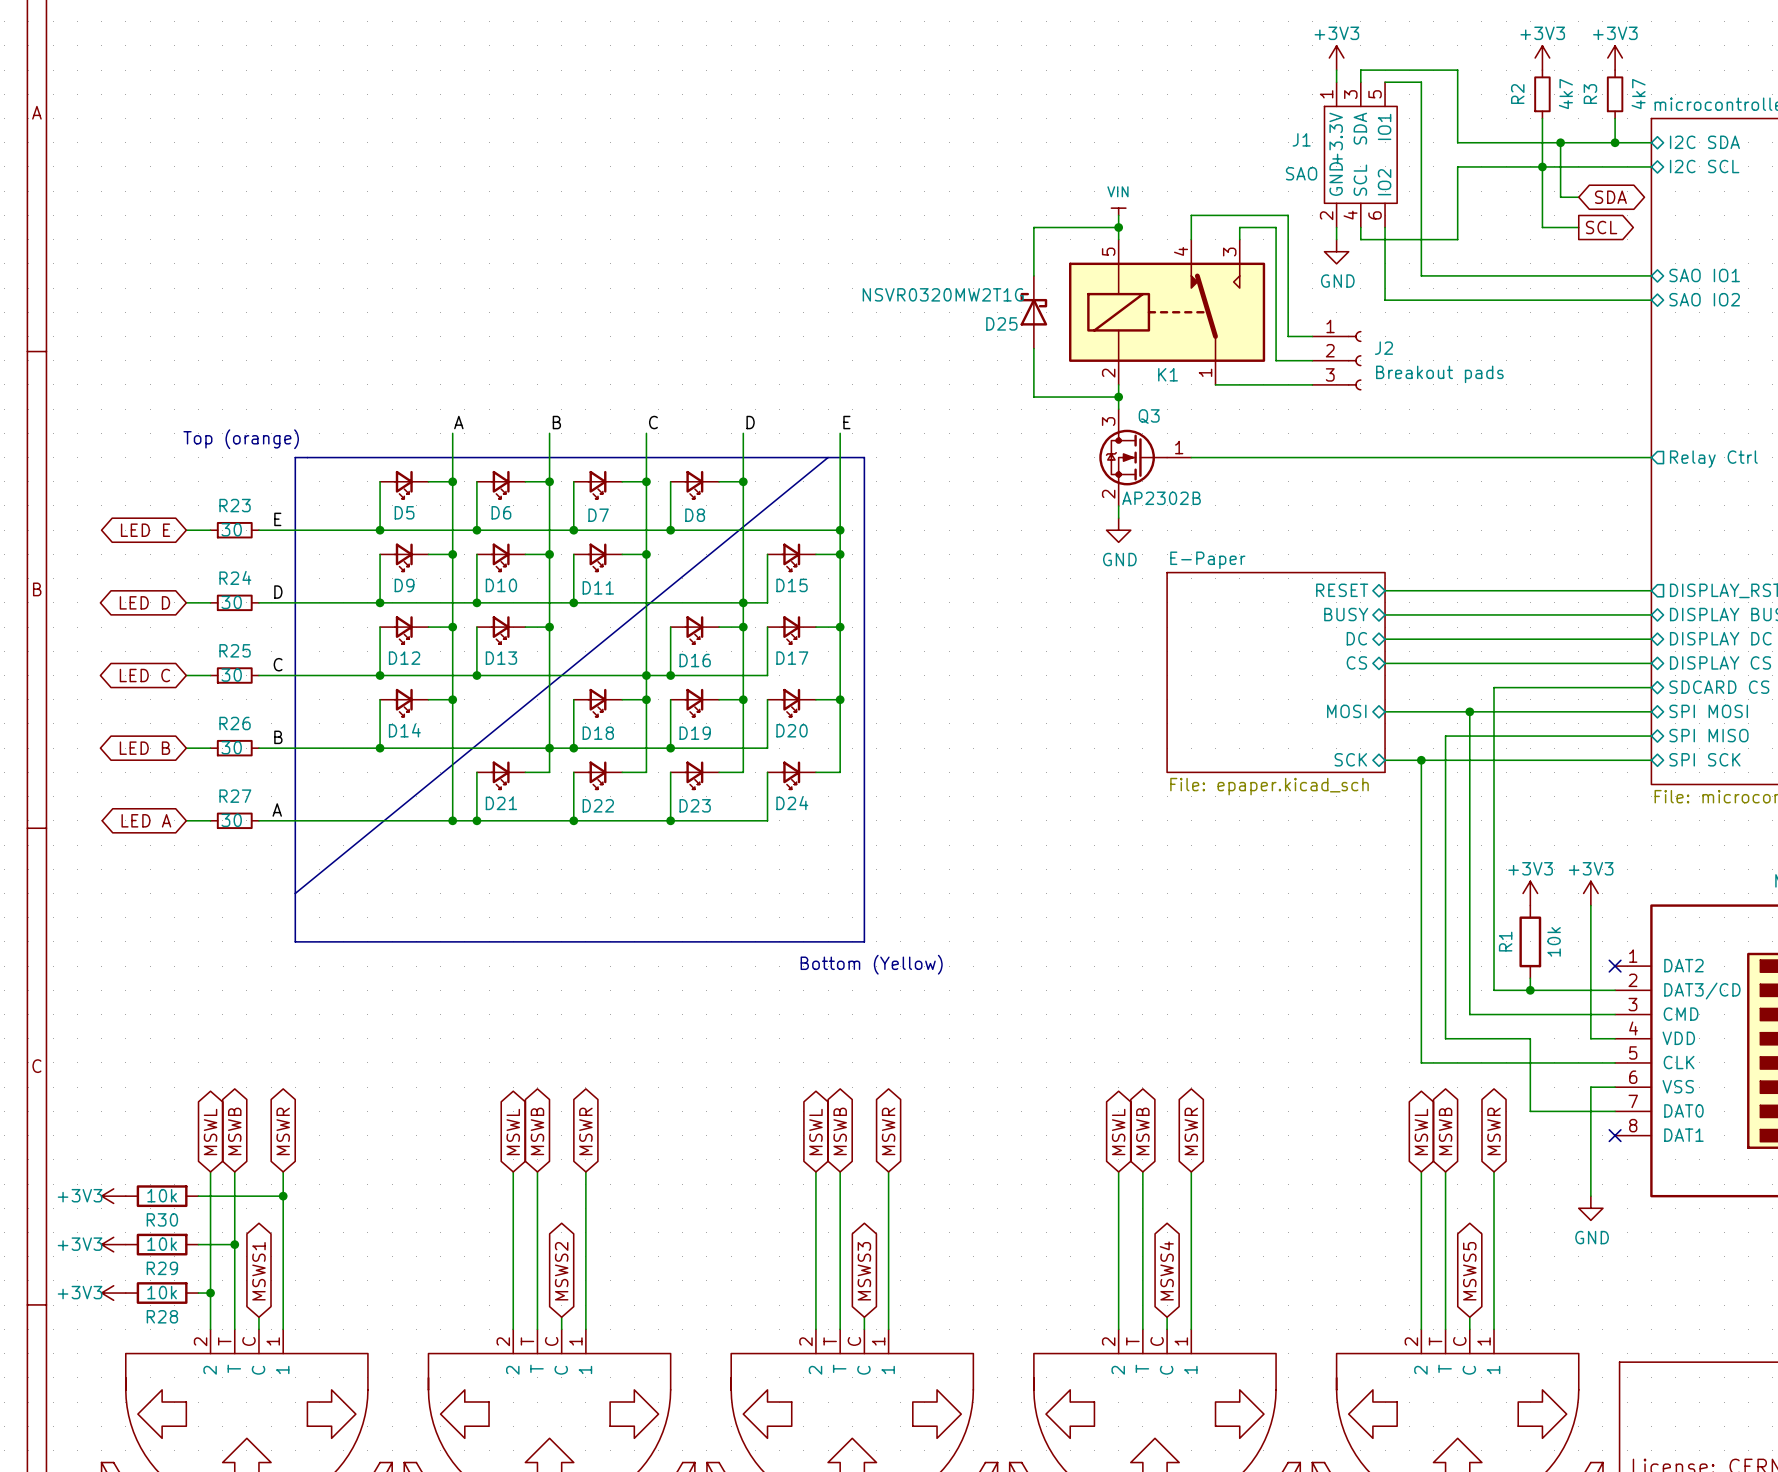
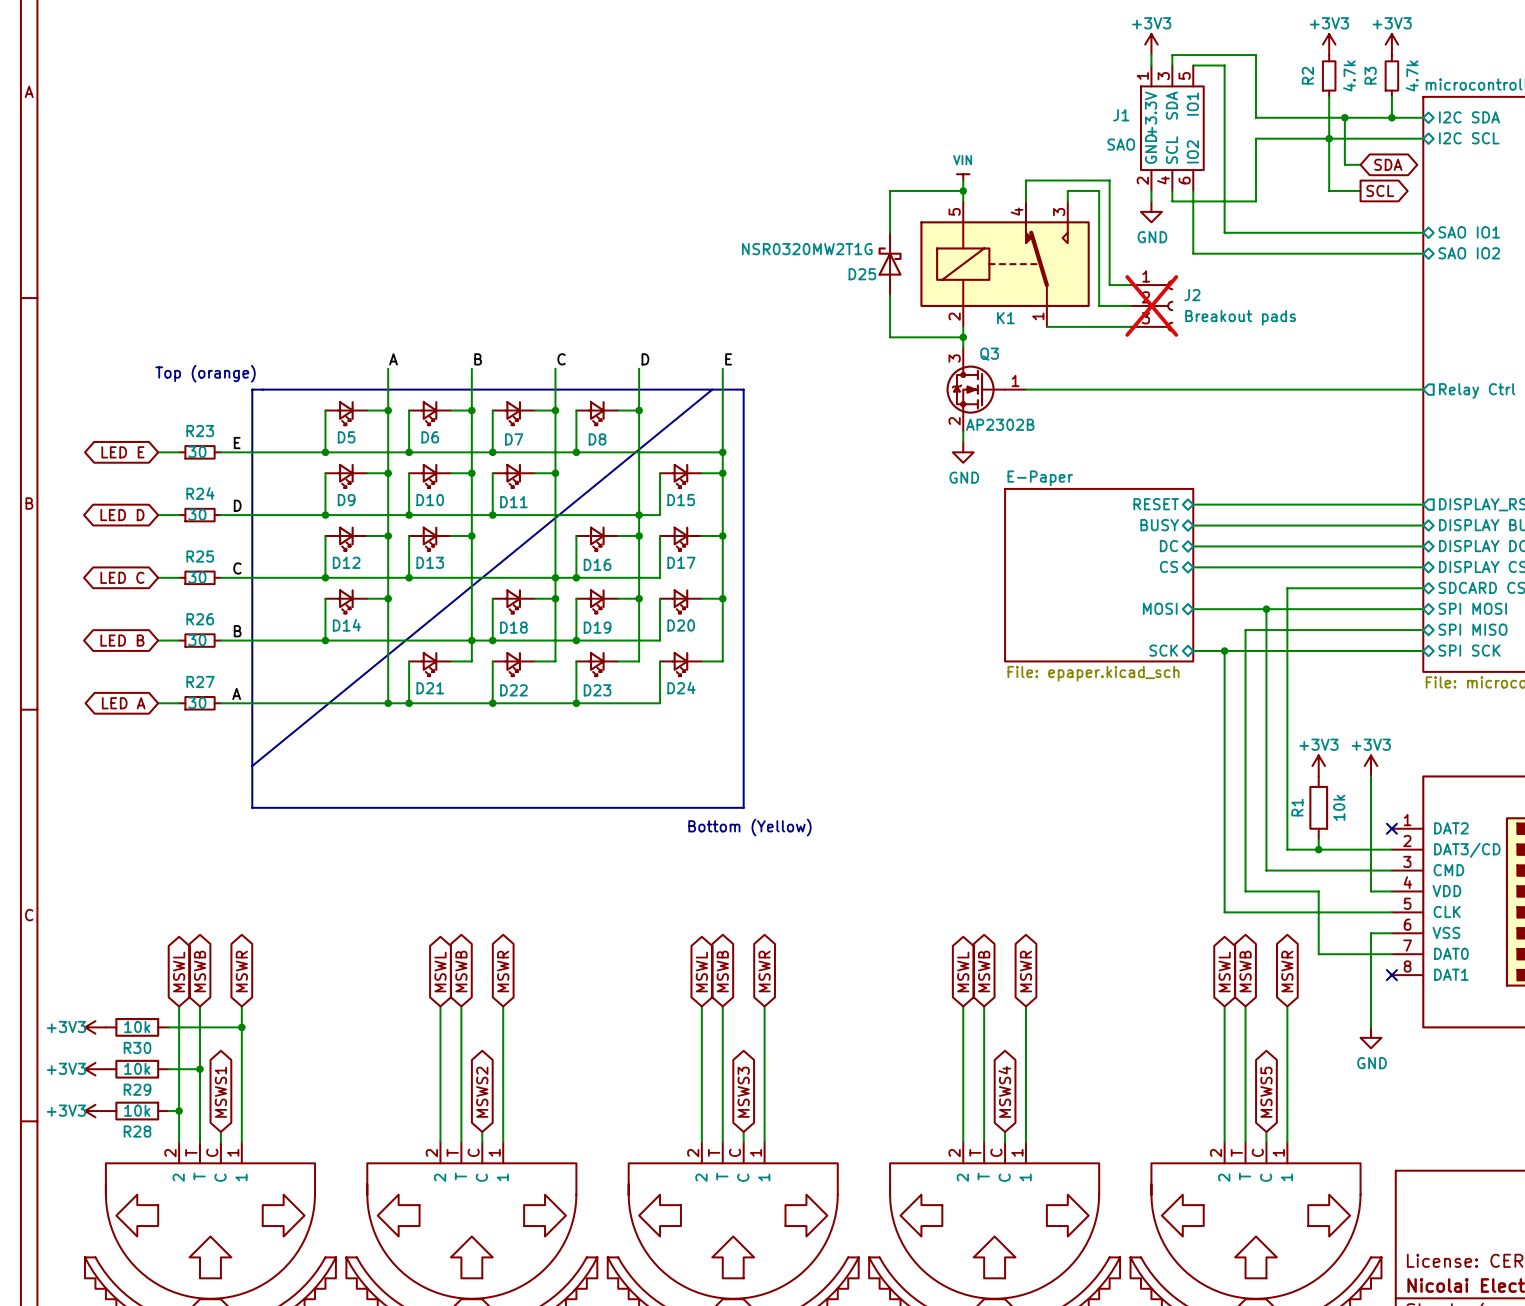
R2 value: 4k7 (1565, 94) -> 4.7k (1349, 75)
R3 value: 4k7 (1638, 94) -> 4.7k (1412, 75)
D25 value: NSVR0320MW2T1G (943, 294) -> NSR0320MW2T1G (807, 249)
J2 do-not-place cross: none -> (1151, 305)

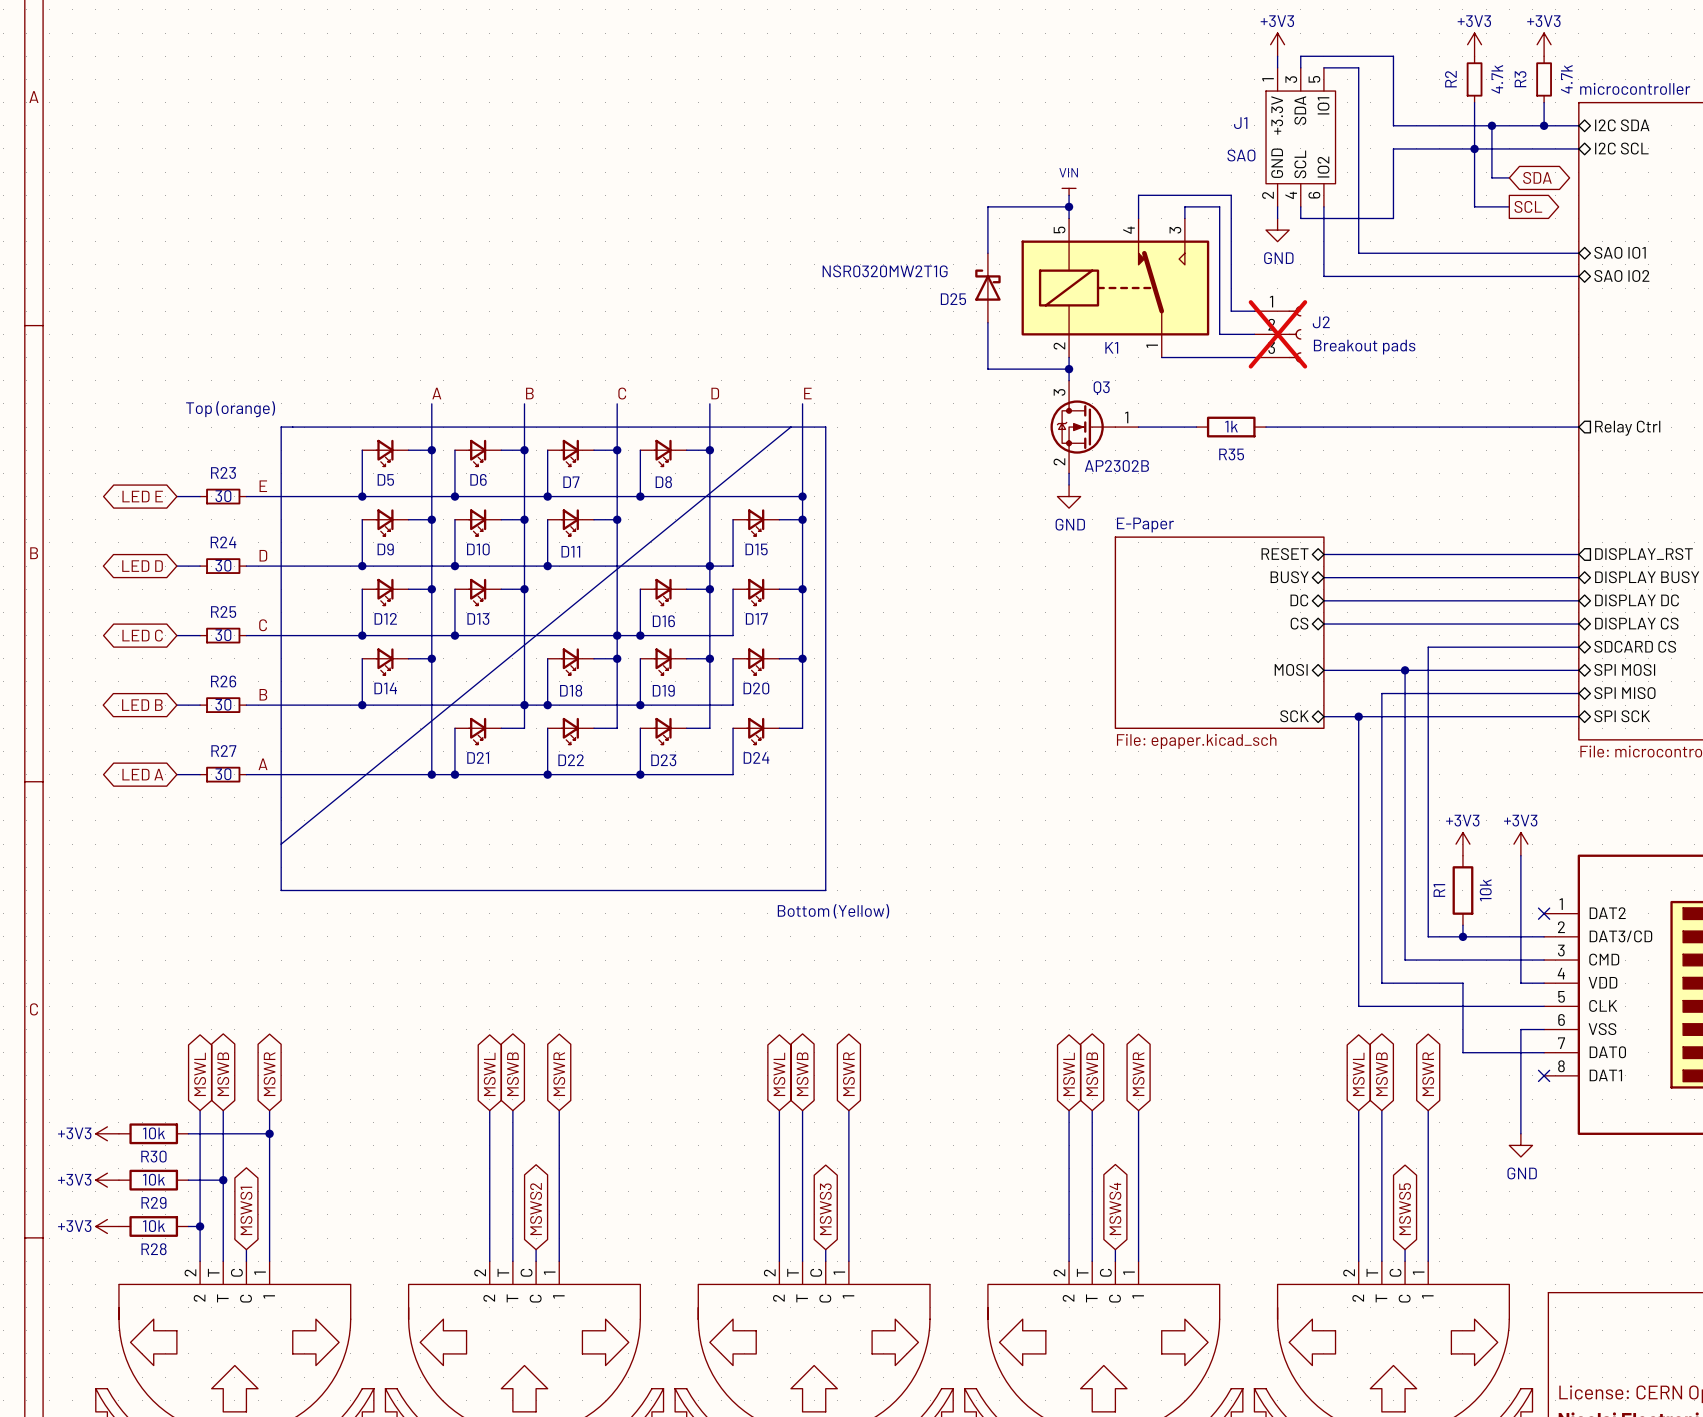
wire: (1078, 389) (1140, 389) -> none
R35: none -> 1k (1231, 427)

